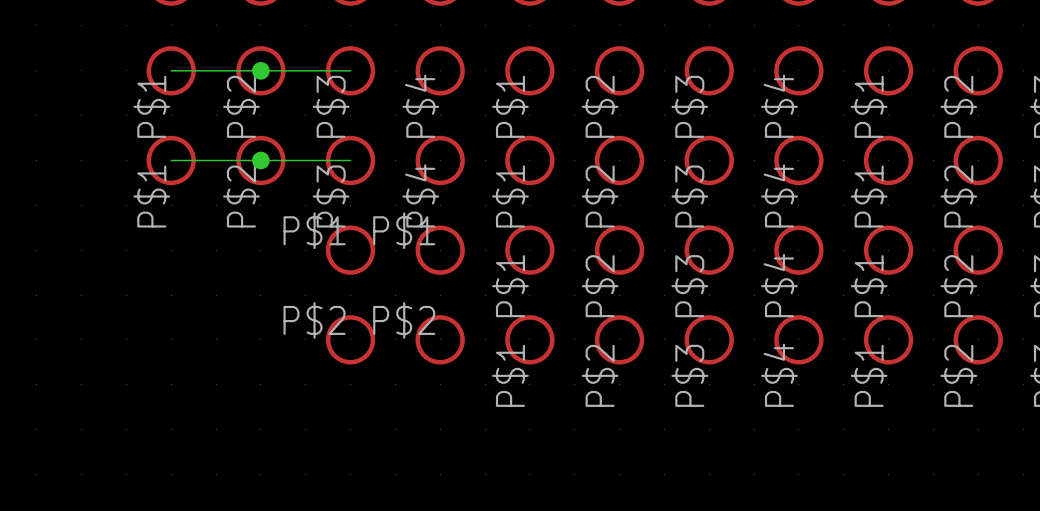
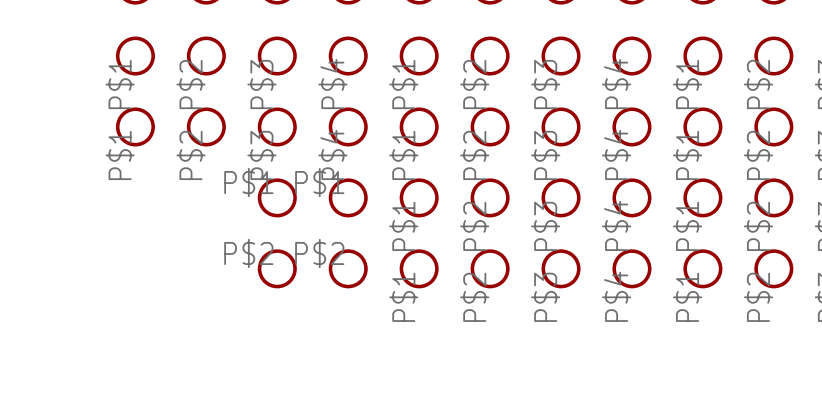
wire: (171, 70) (350, 70) -> none
junction: (260, 70) -> none
wire: (171, 160) (350, 160) -> none
junction: (260, 160) -> none

